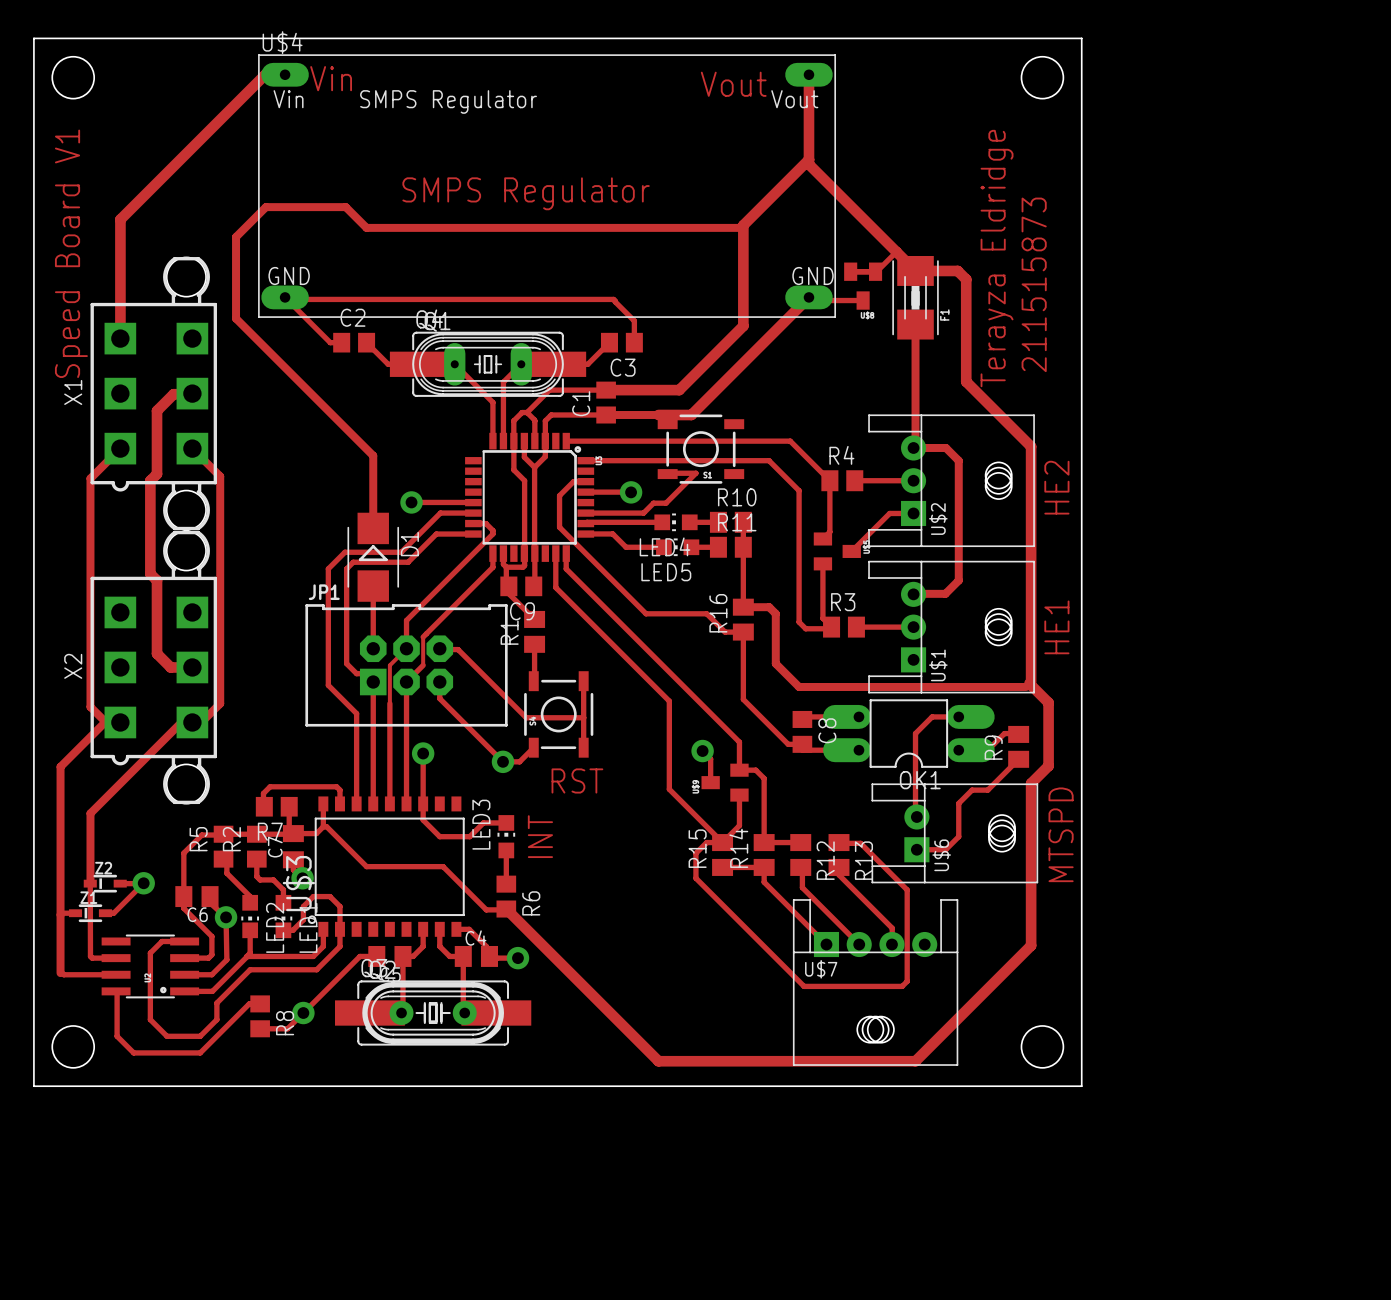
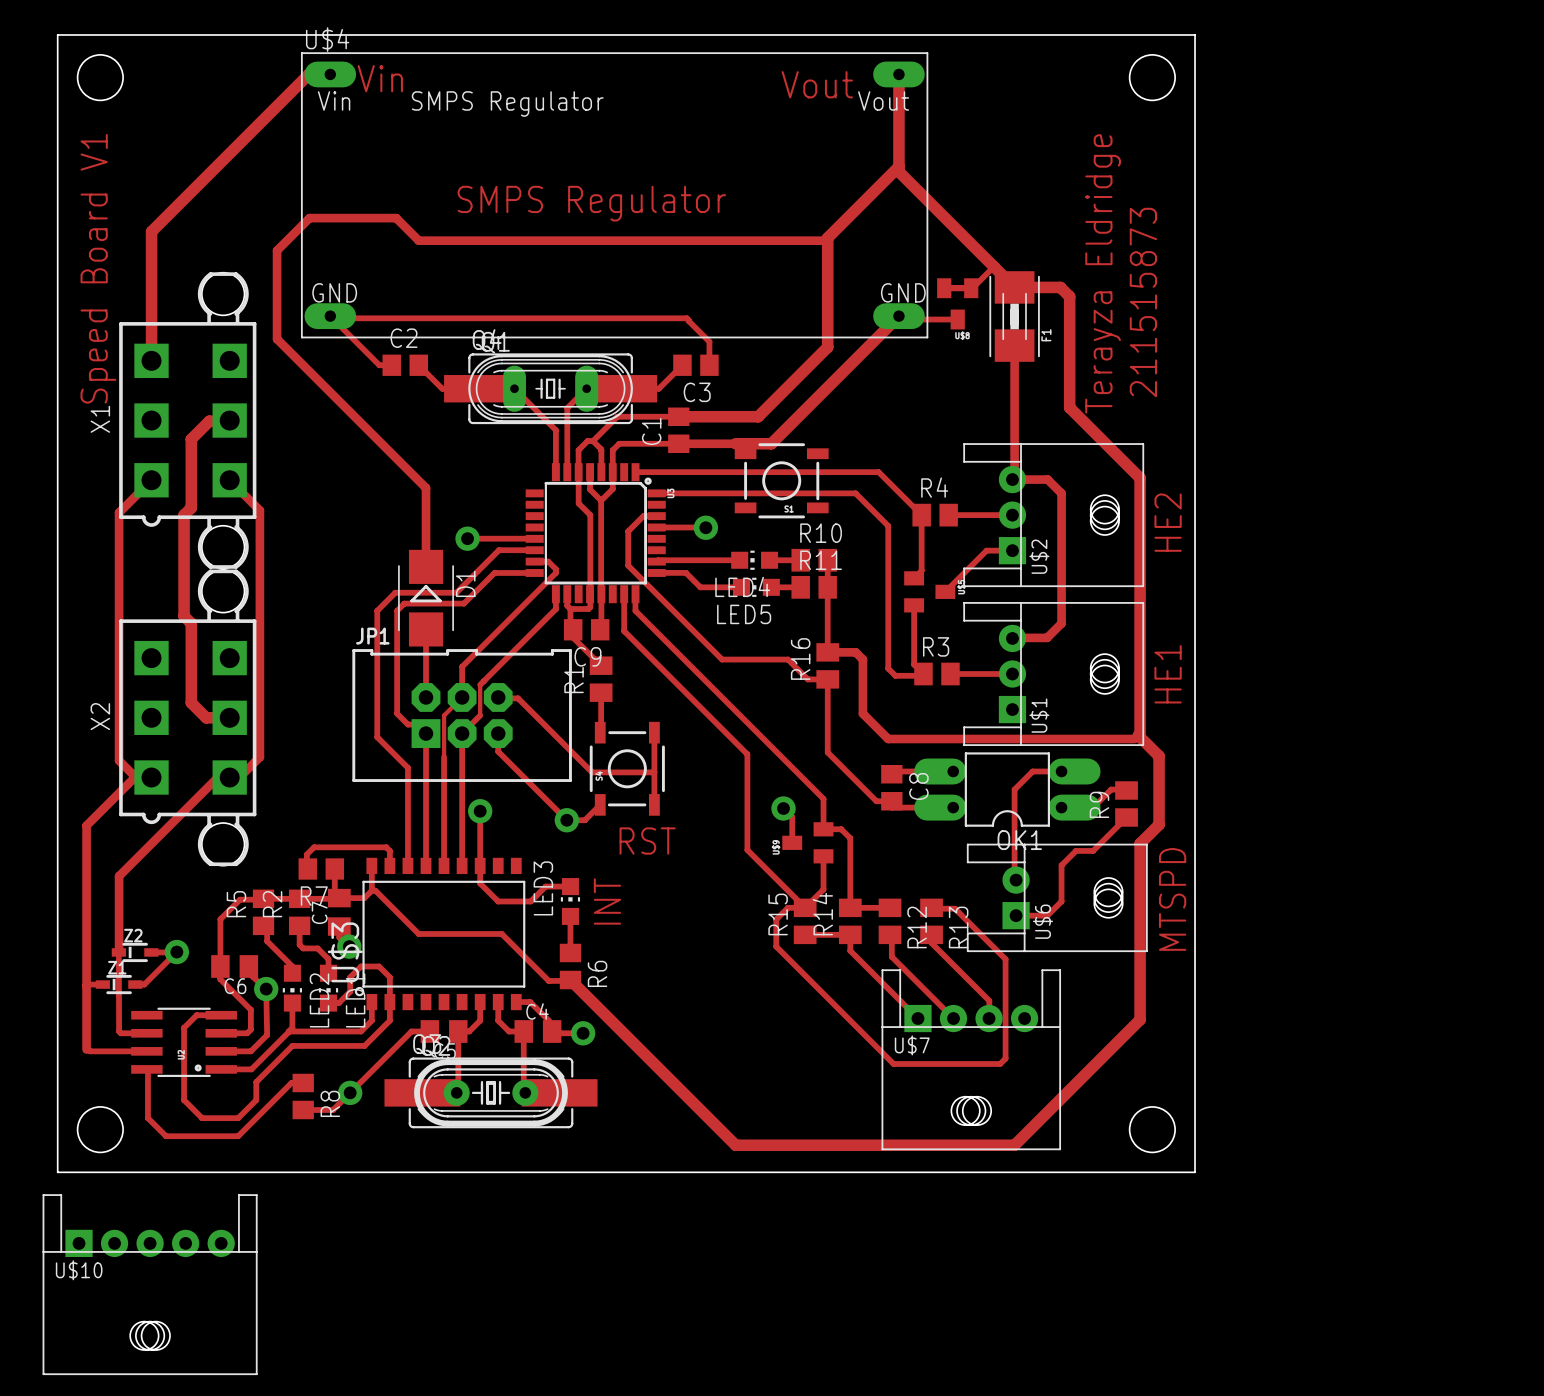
track: (667, 474) (695, 473) (666, 503) (653, 503) (643, 513) (585, 513) -> none
U$10: none -> (150, 1284)

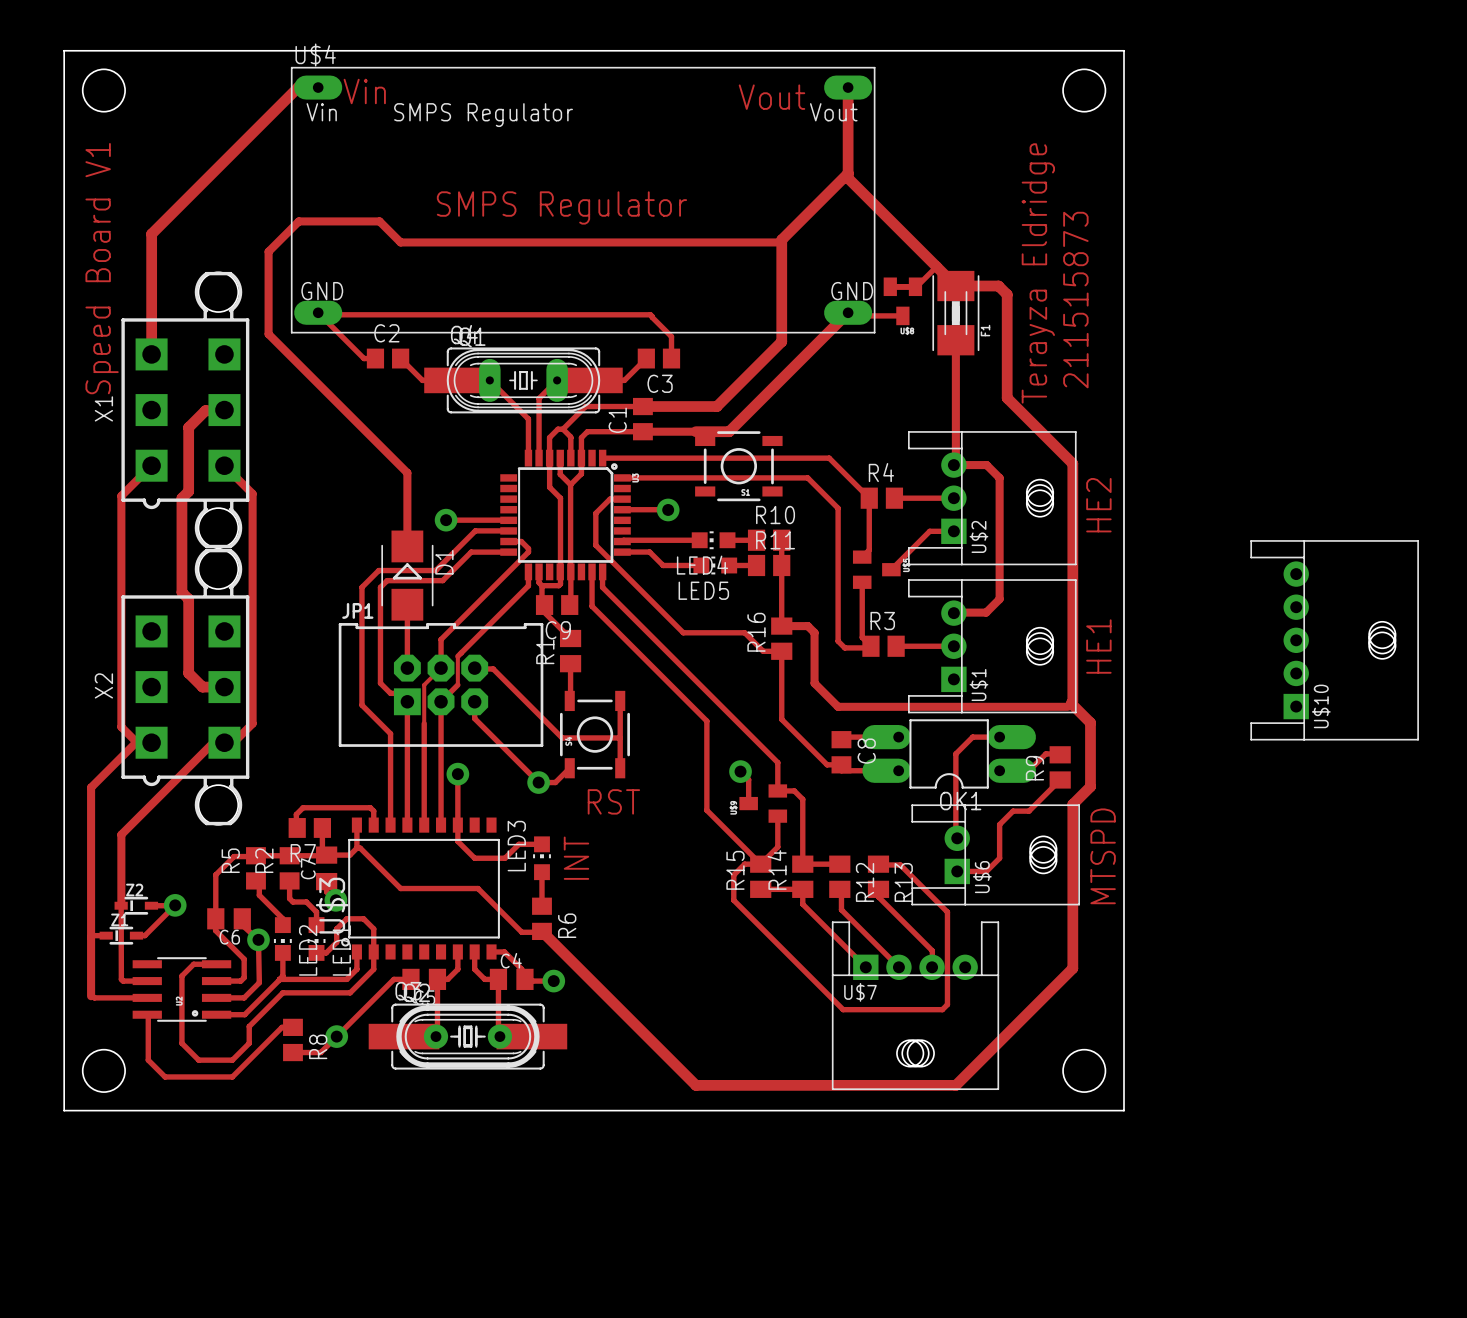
U$10 rotation: 0° (150, 1284) -> 90° counterclockwise (1334, 640)
U$10 position: (150, 1284) -> (1334, 640)

